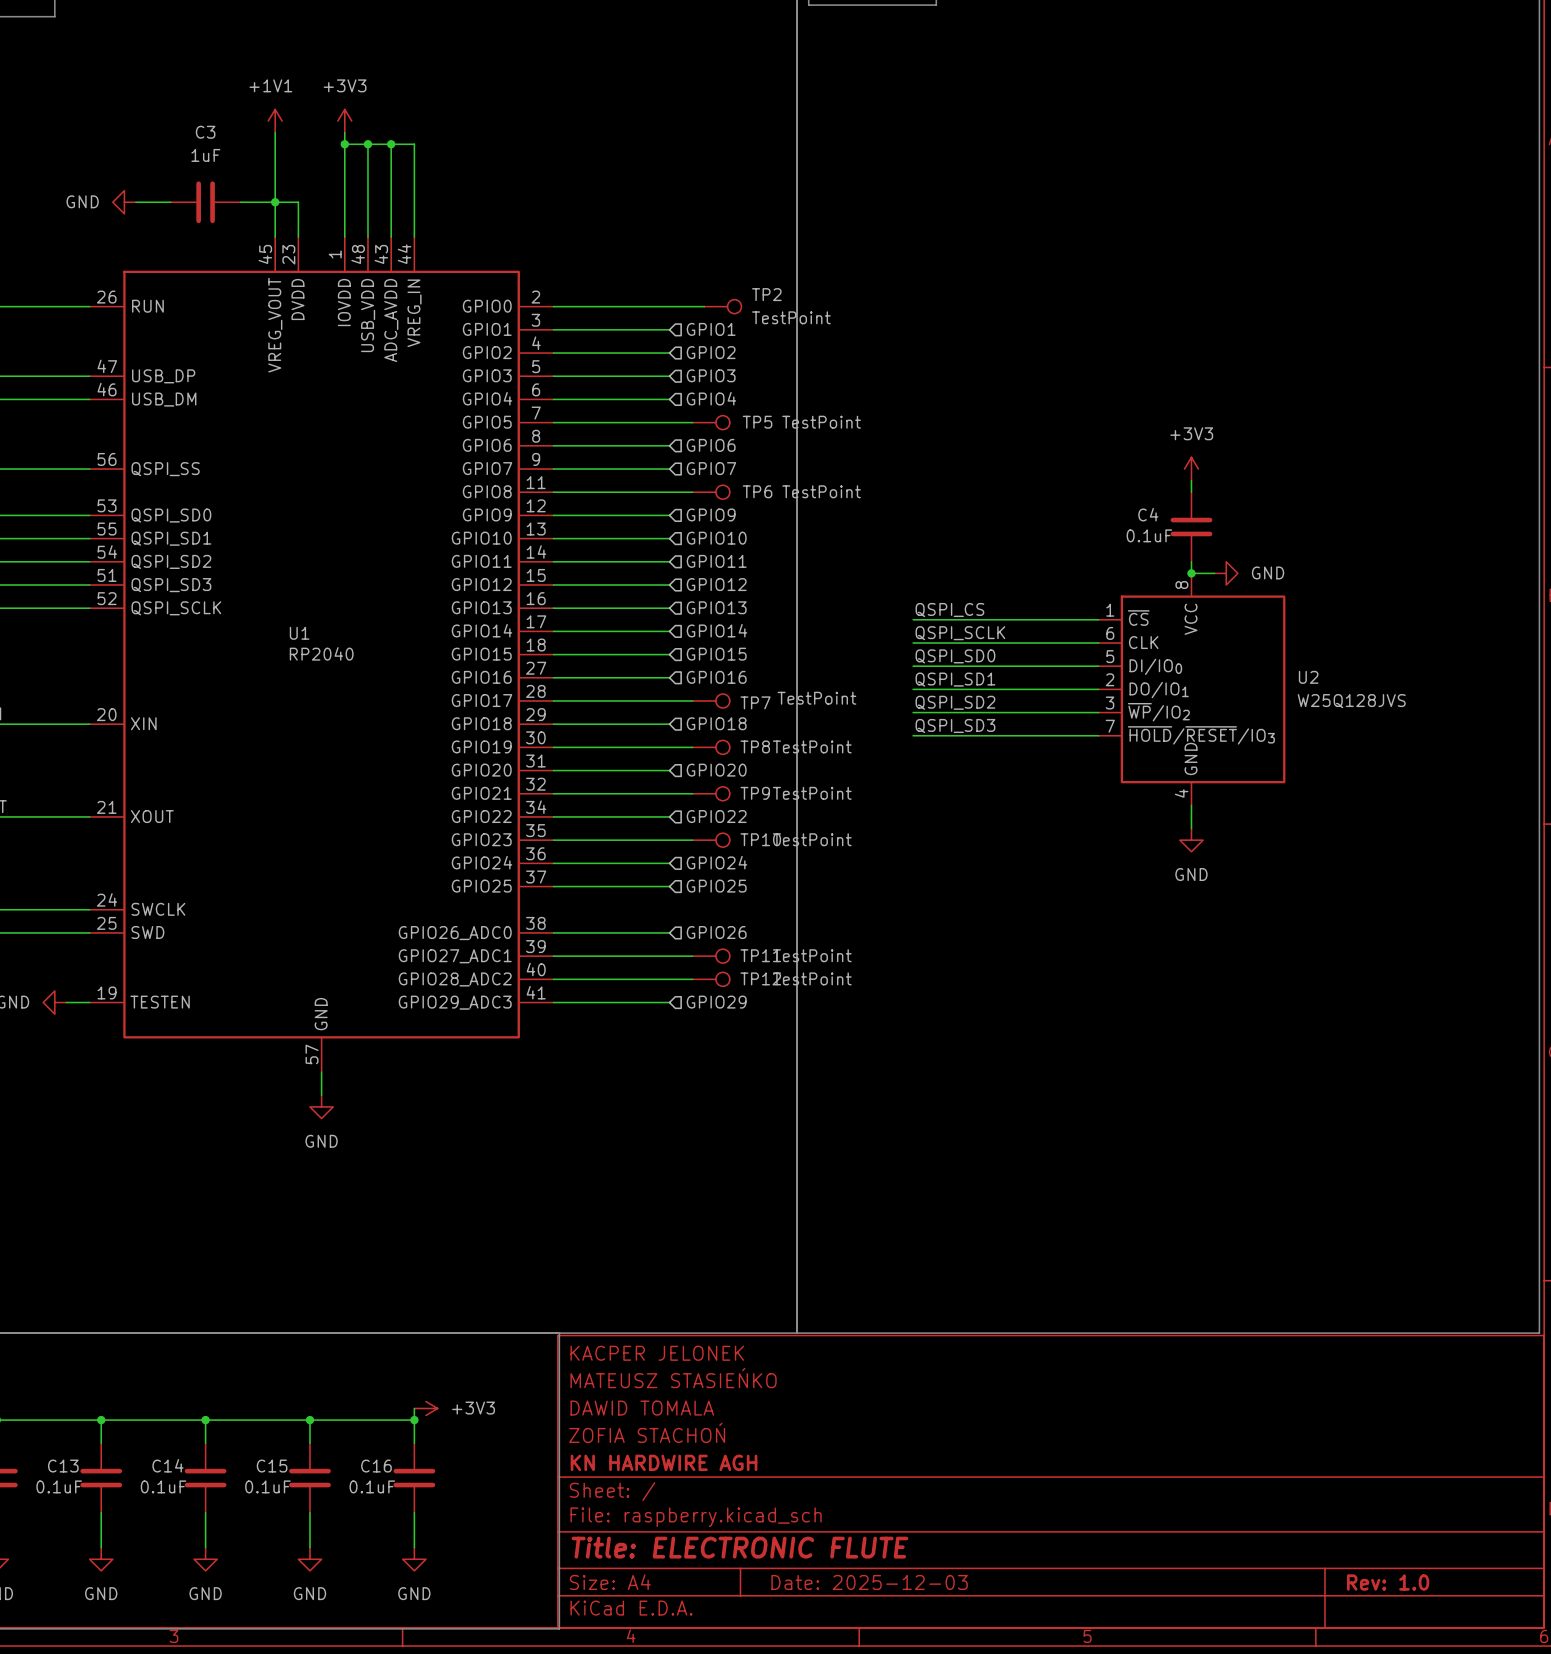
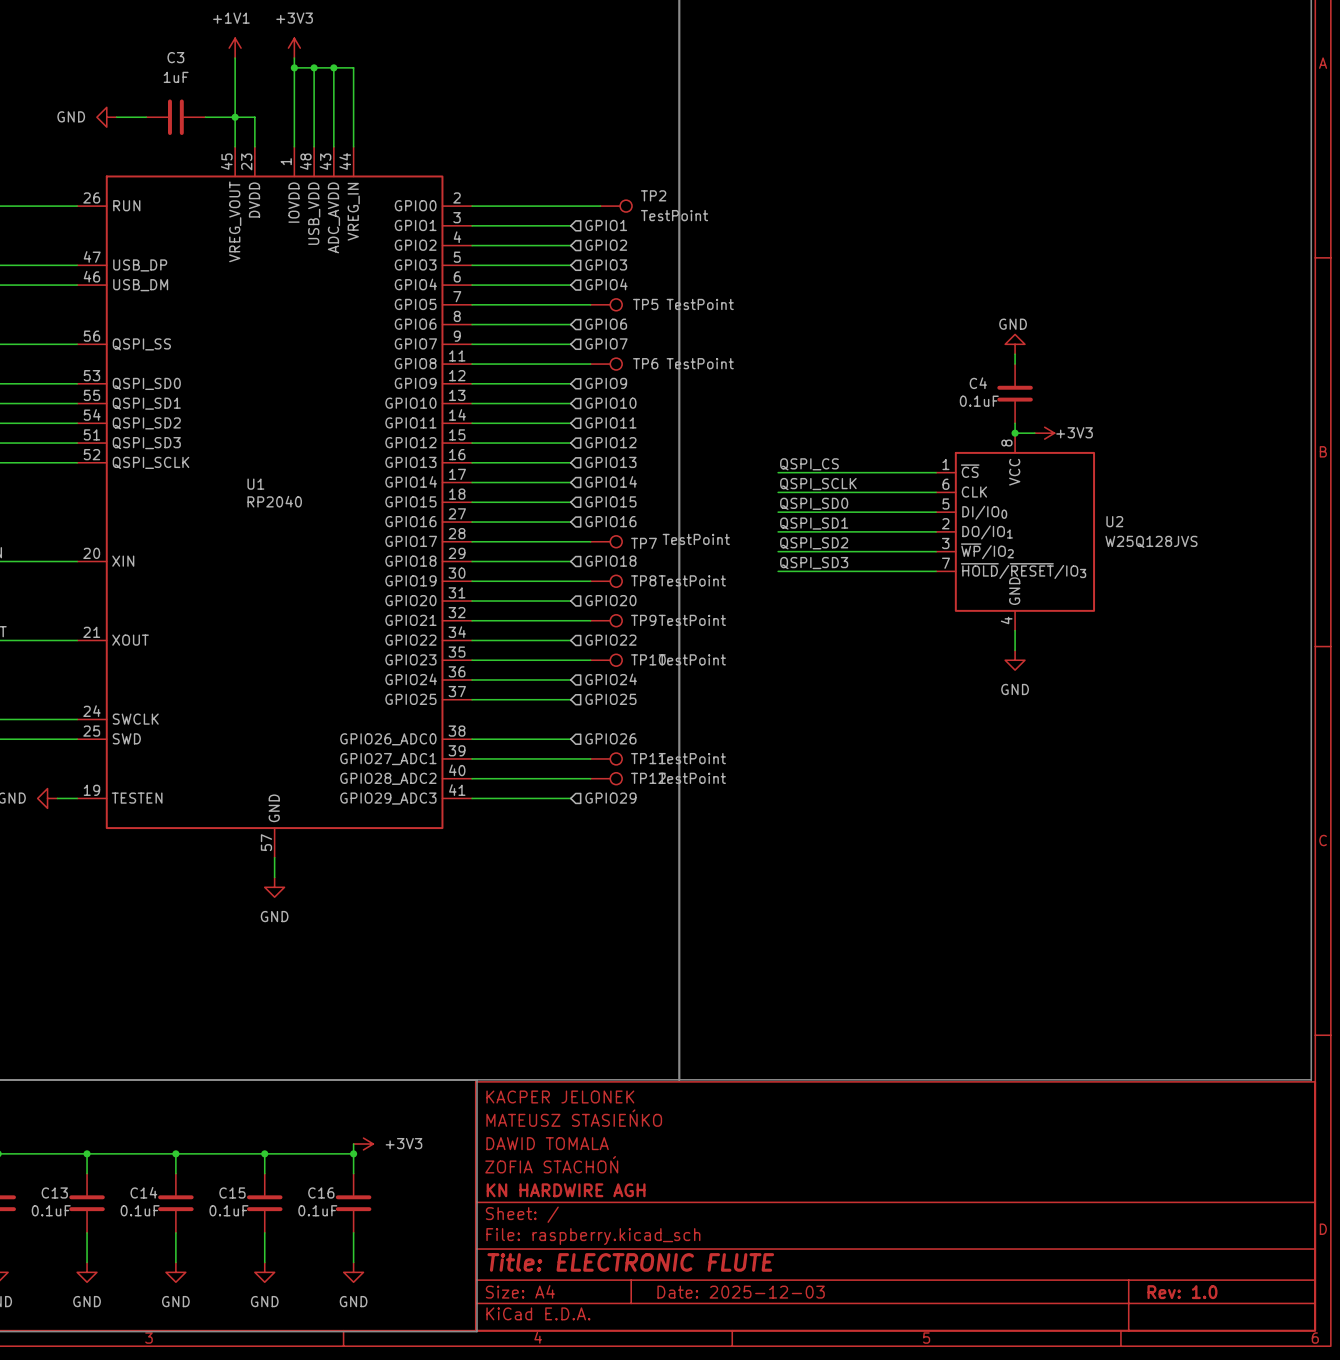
power symbol: +3V3 (1191, 469) -> GND (1015, 344)
power symbol: GND (1226, 573) -> +3V3 (1044, 433)

